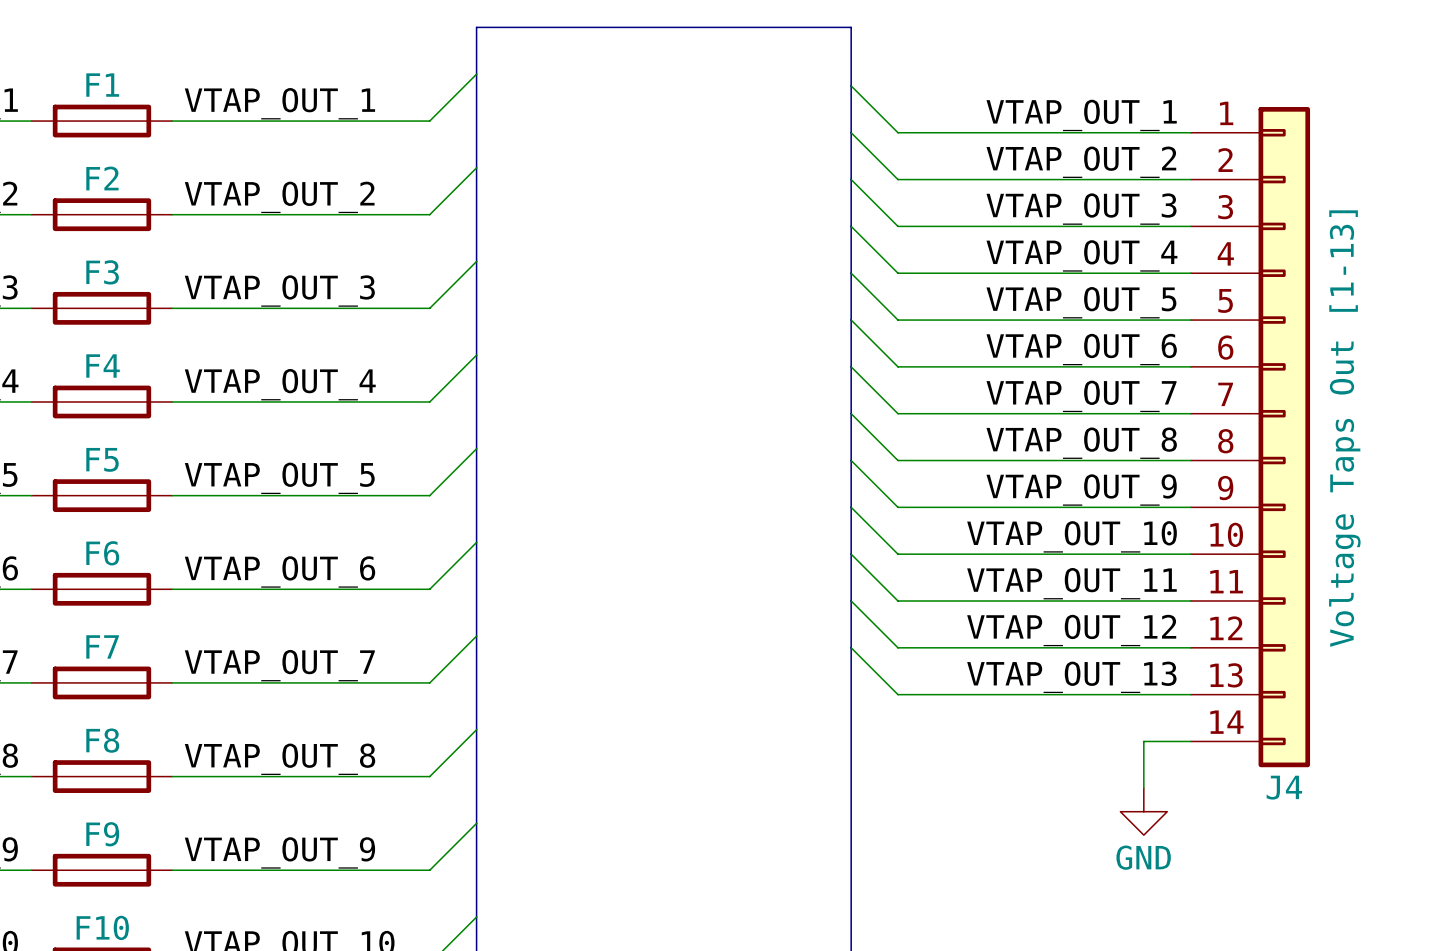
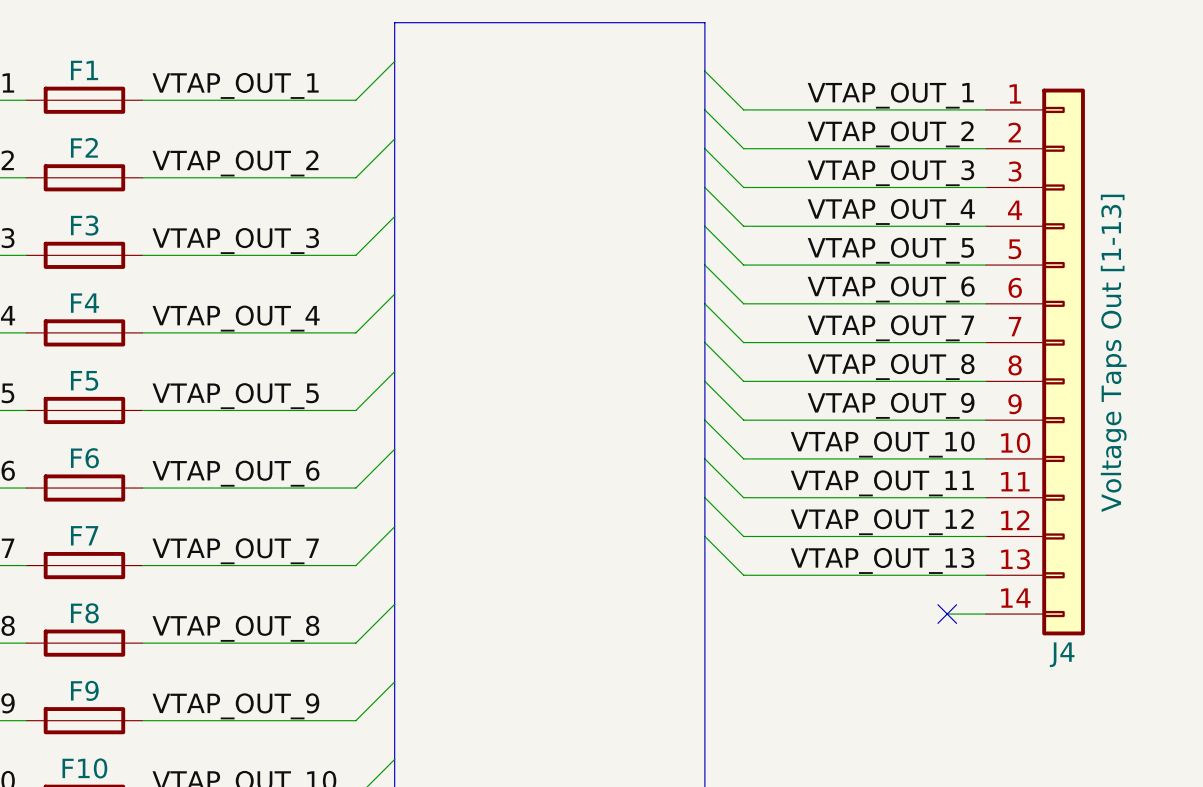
wire: (1143, 741) (1143, 788) -> none
no-connect mark: none -> (947, 614)
power symbol: GND (1143, 811) -> none

